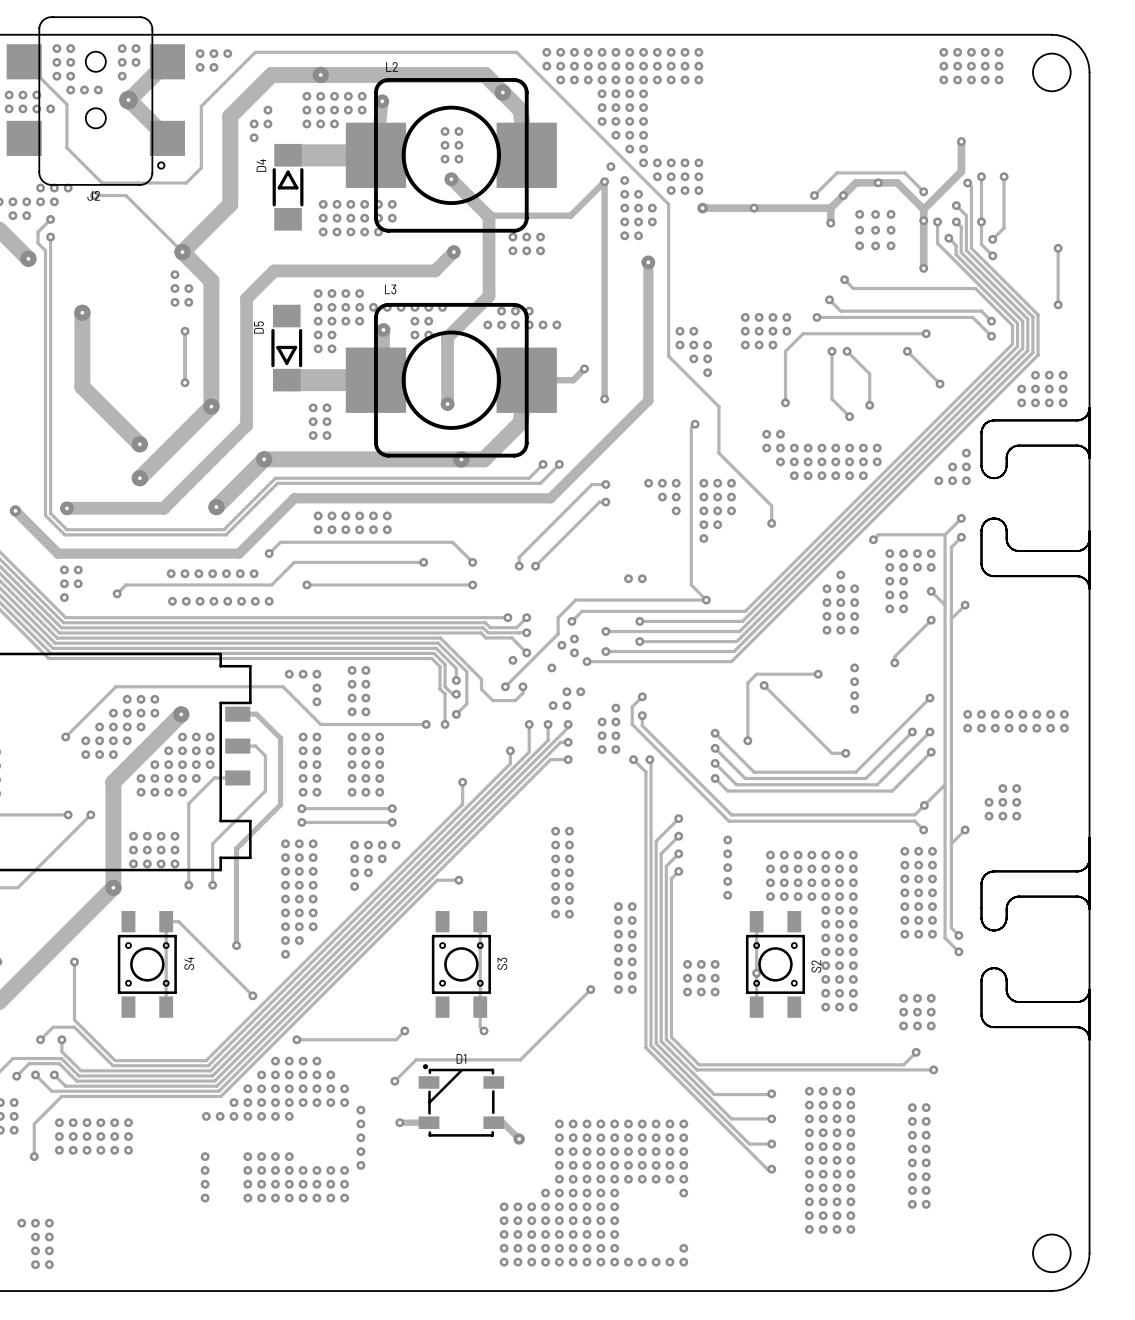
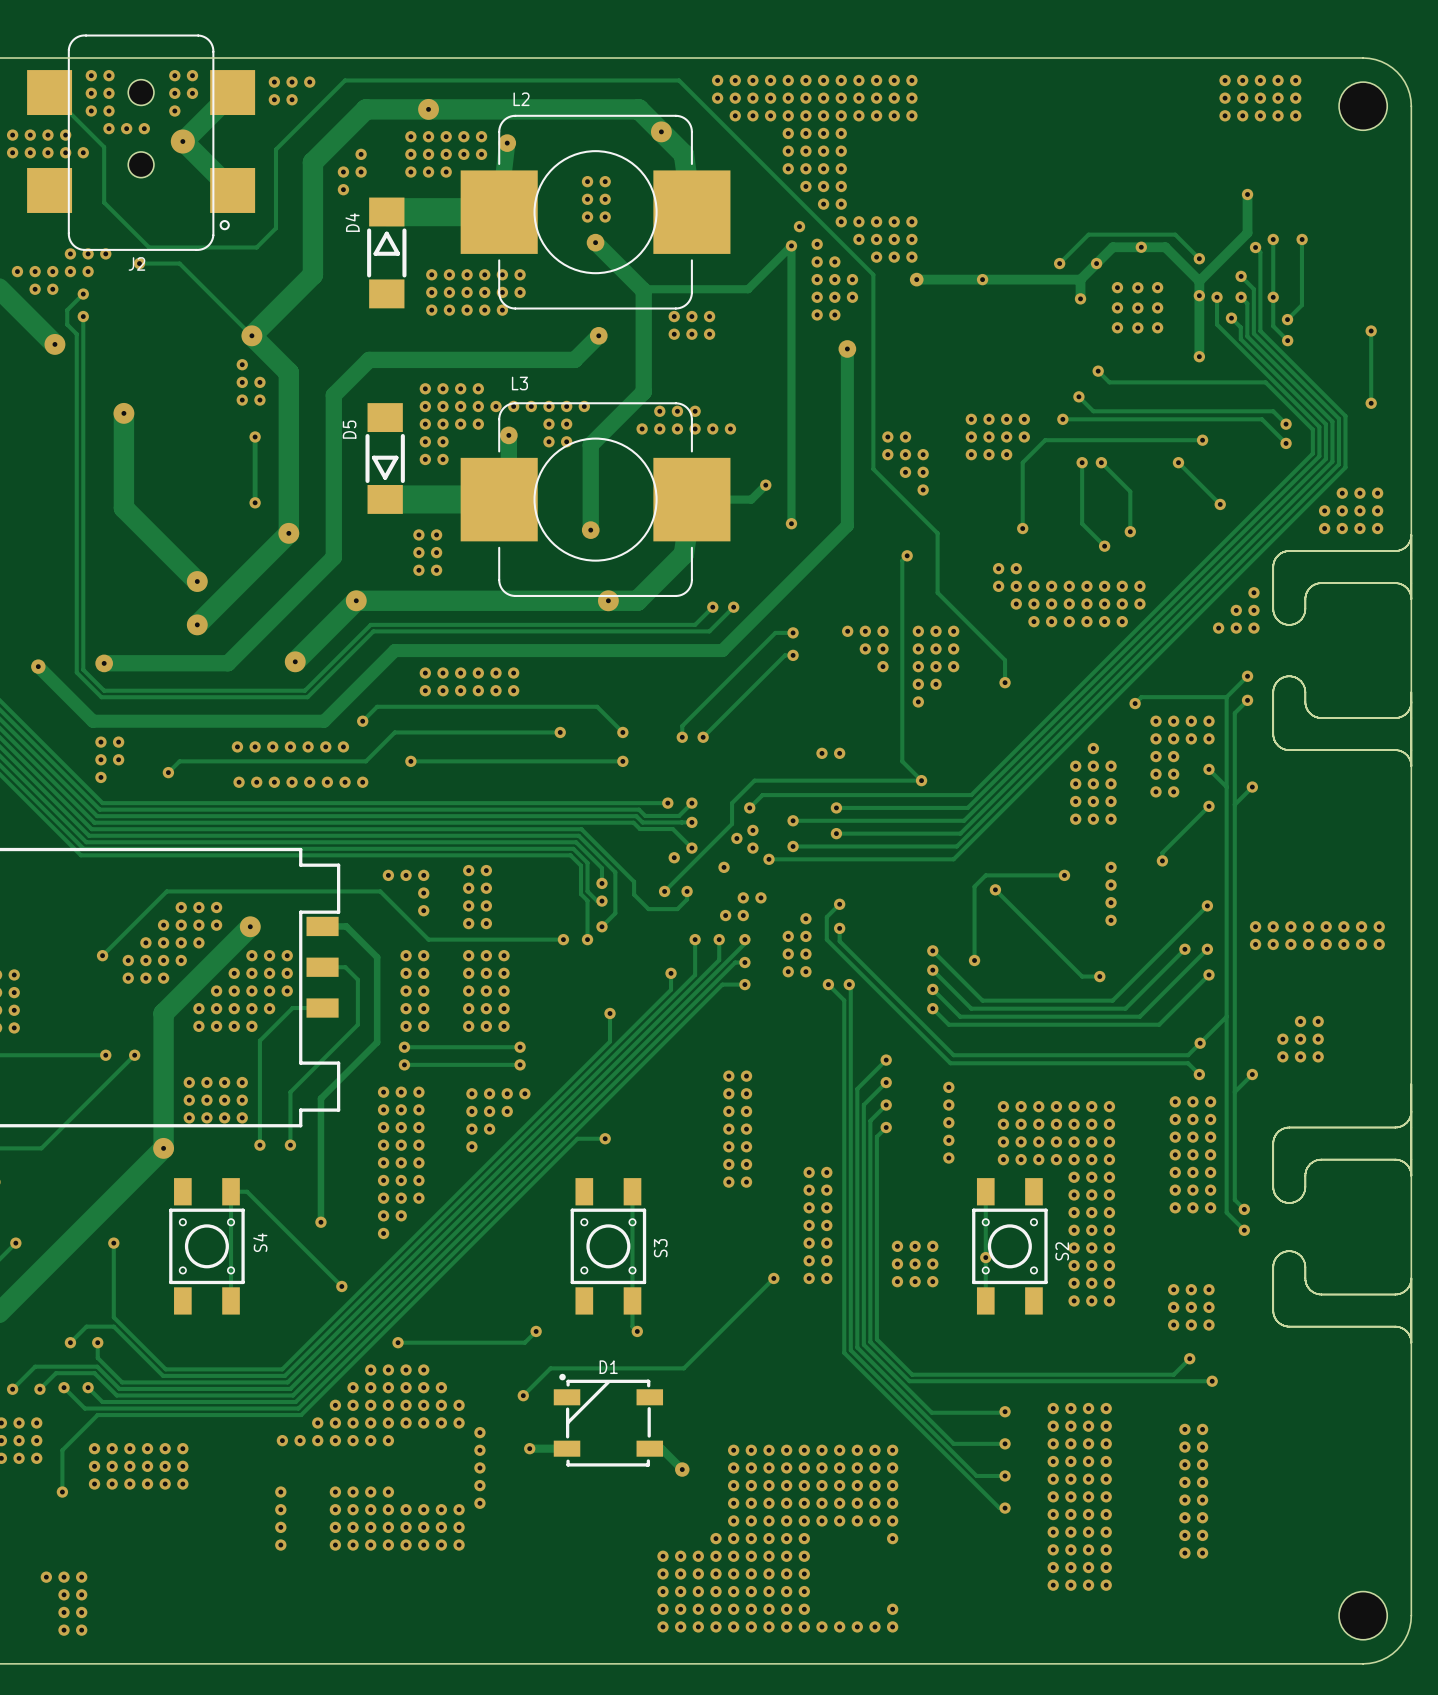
L2 footprint: [345, 78, 557, 233] -> [460, 114, 731, 310]
L3 footprint: [345, 302, 557, 458] -> [460, 402, 731, 597]

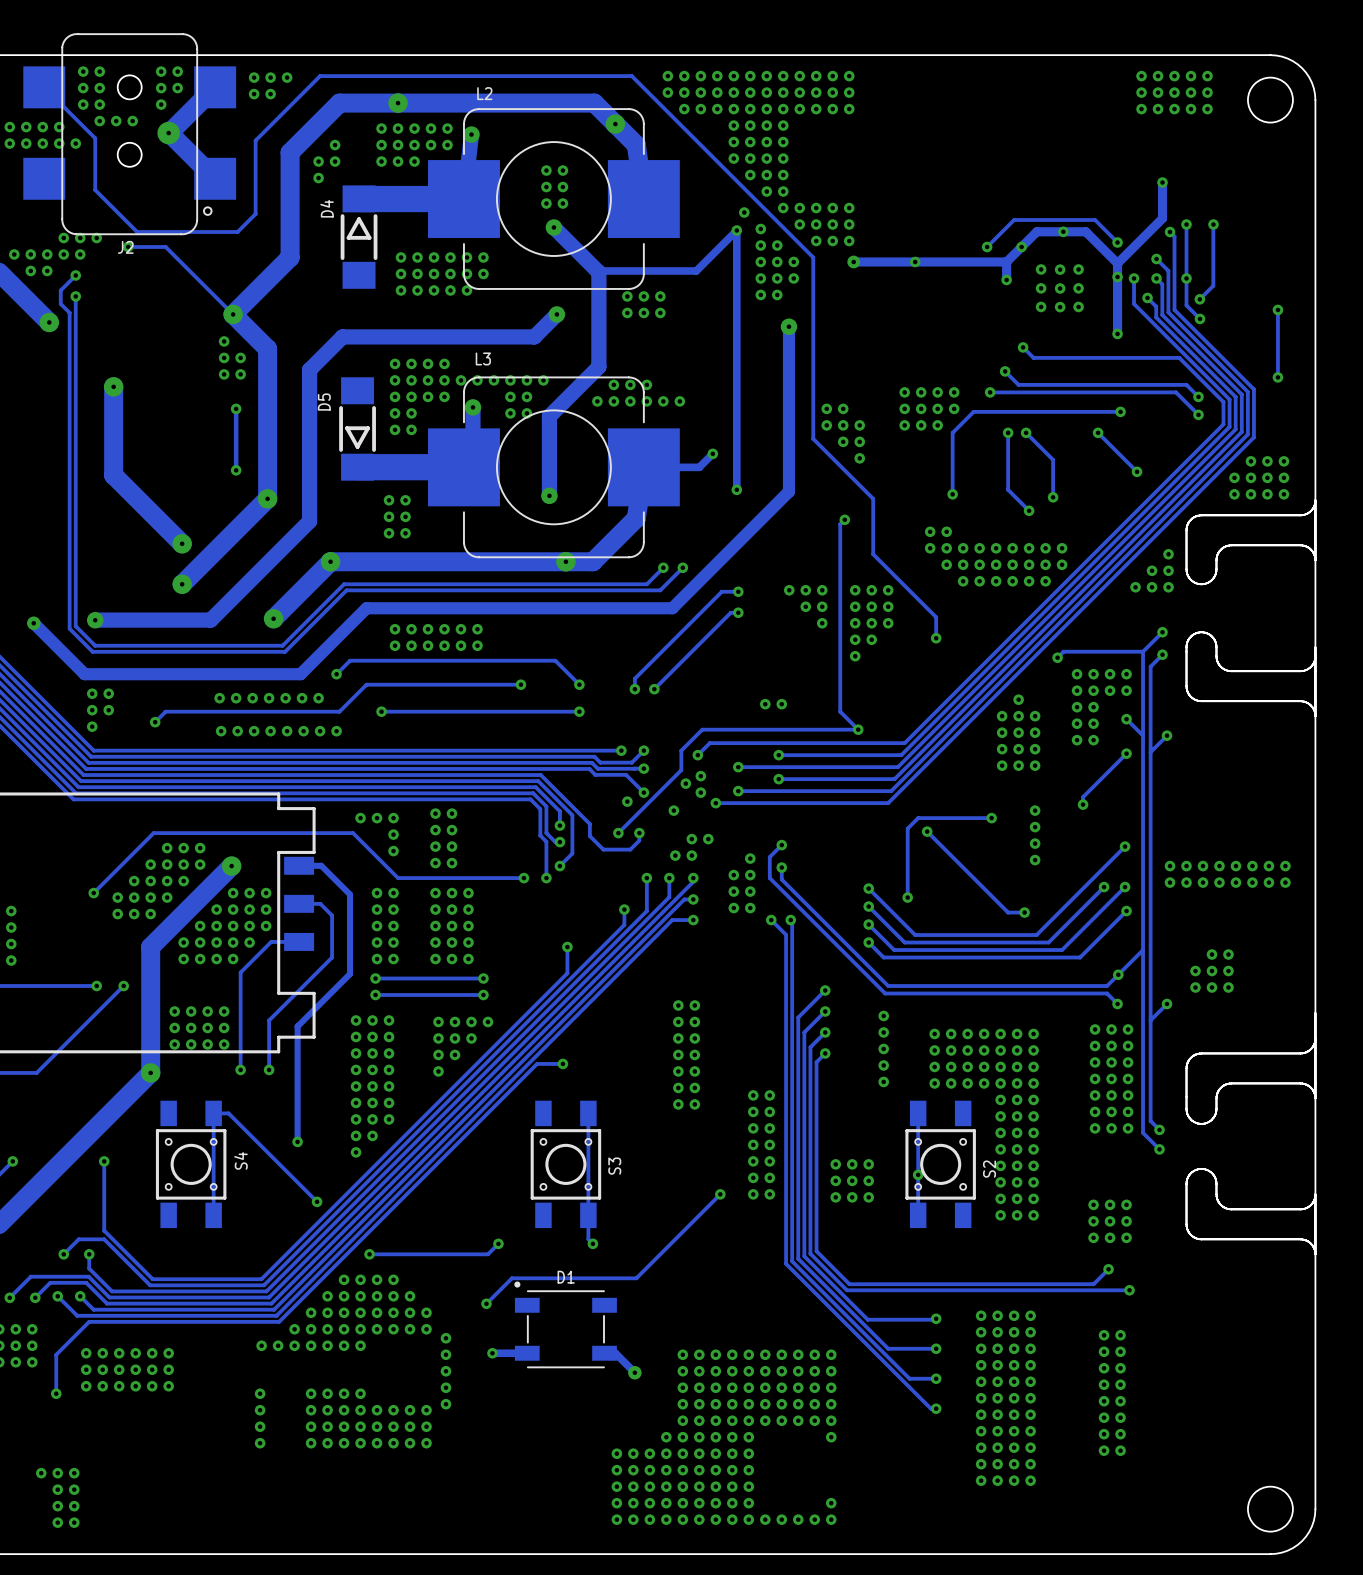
D1 footprint: [553, 1373, 664, 1467] -> [514, 1281, 617, 1369]

